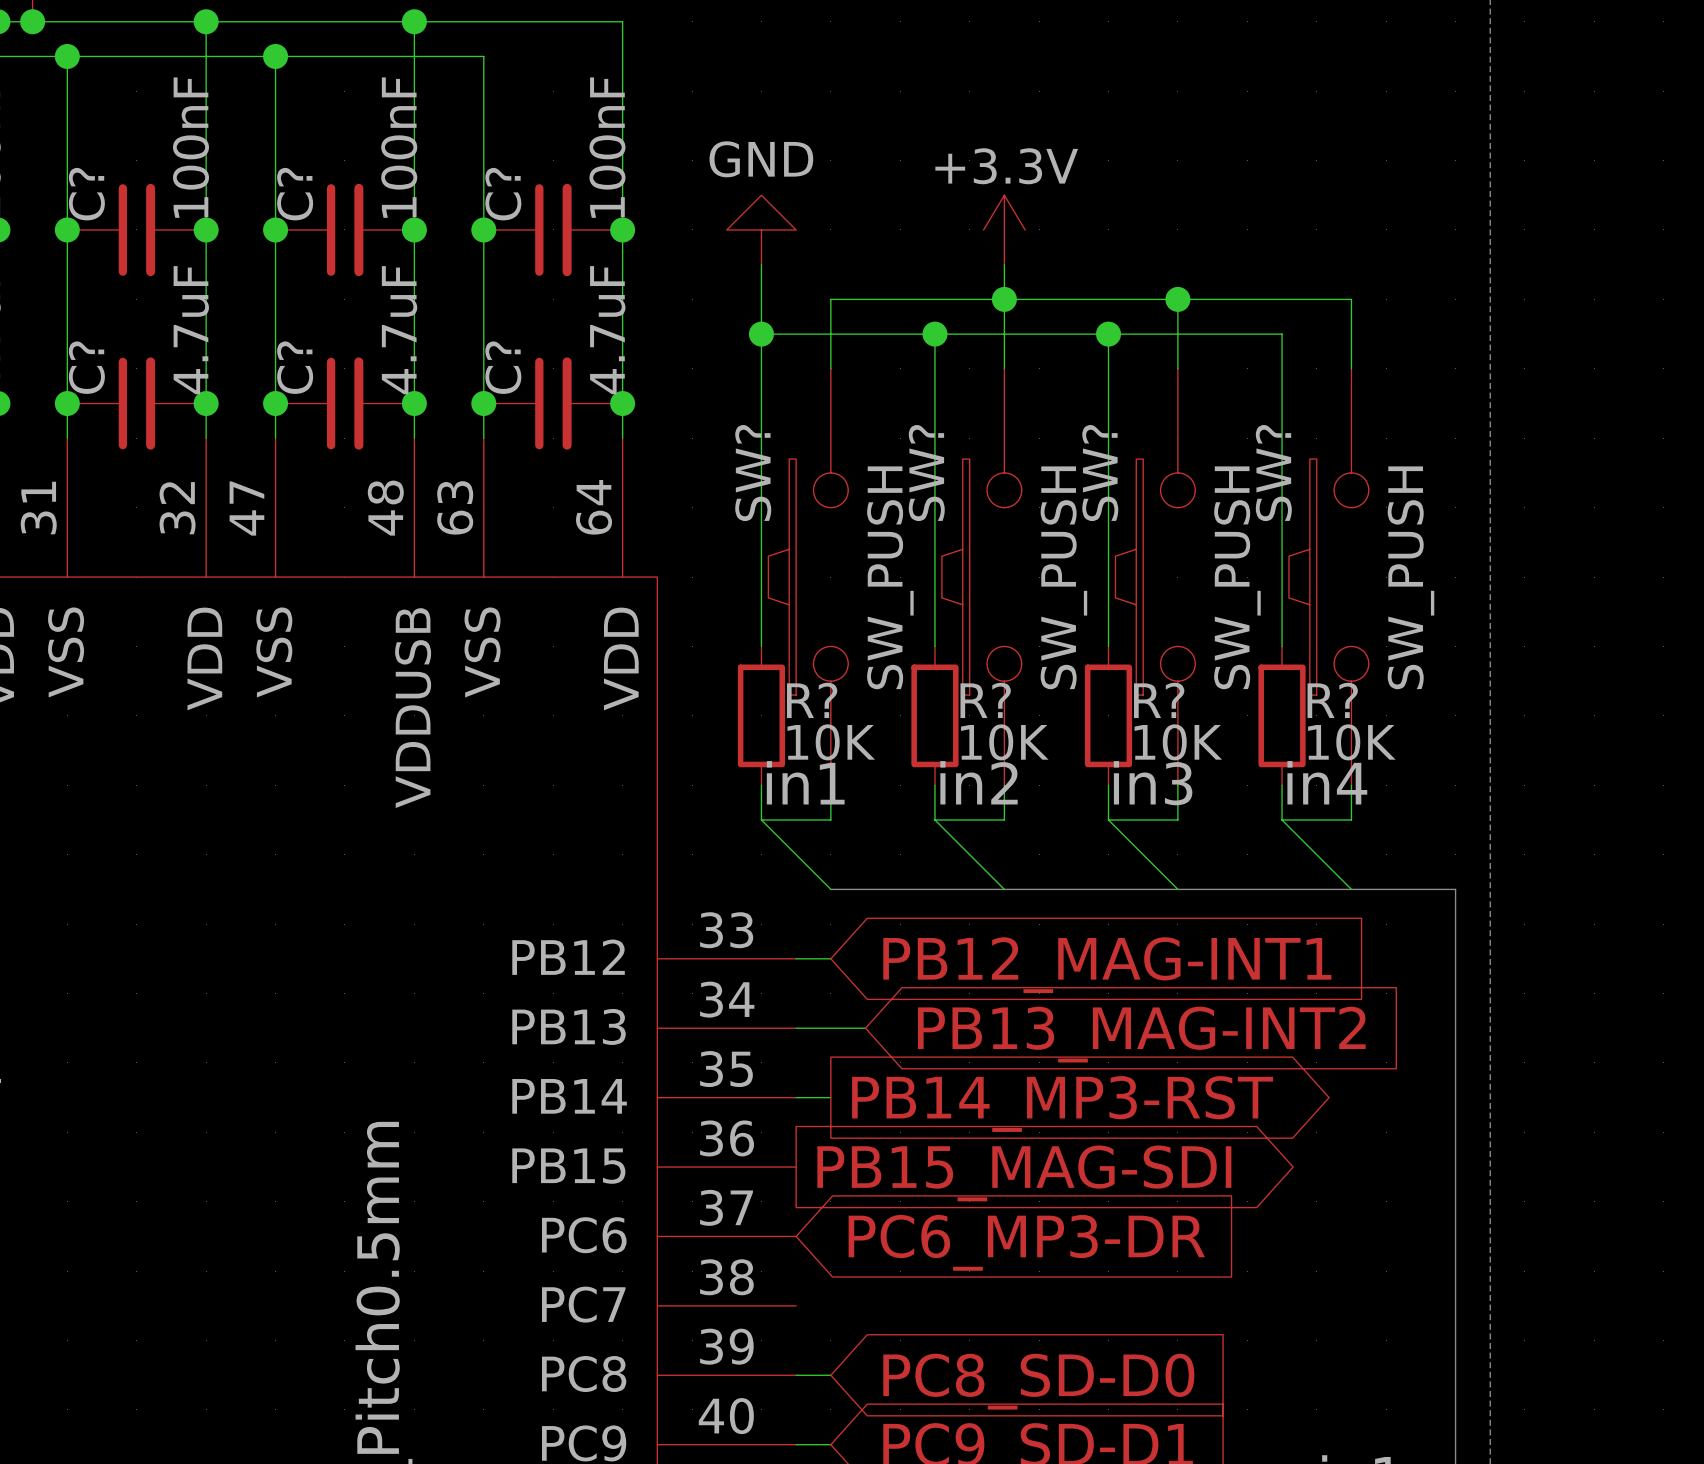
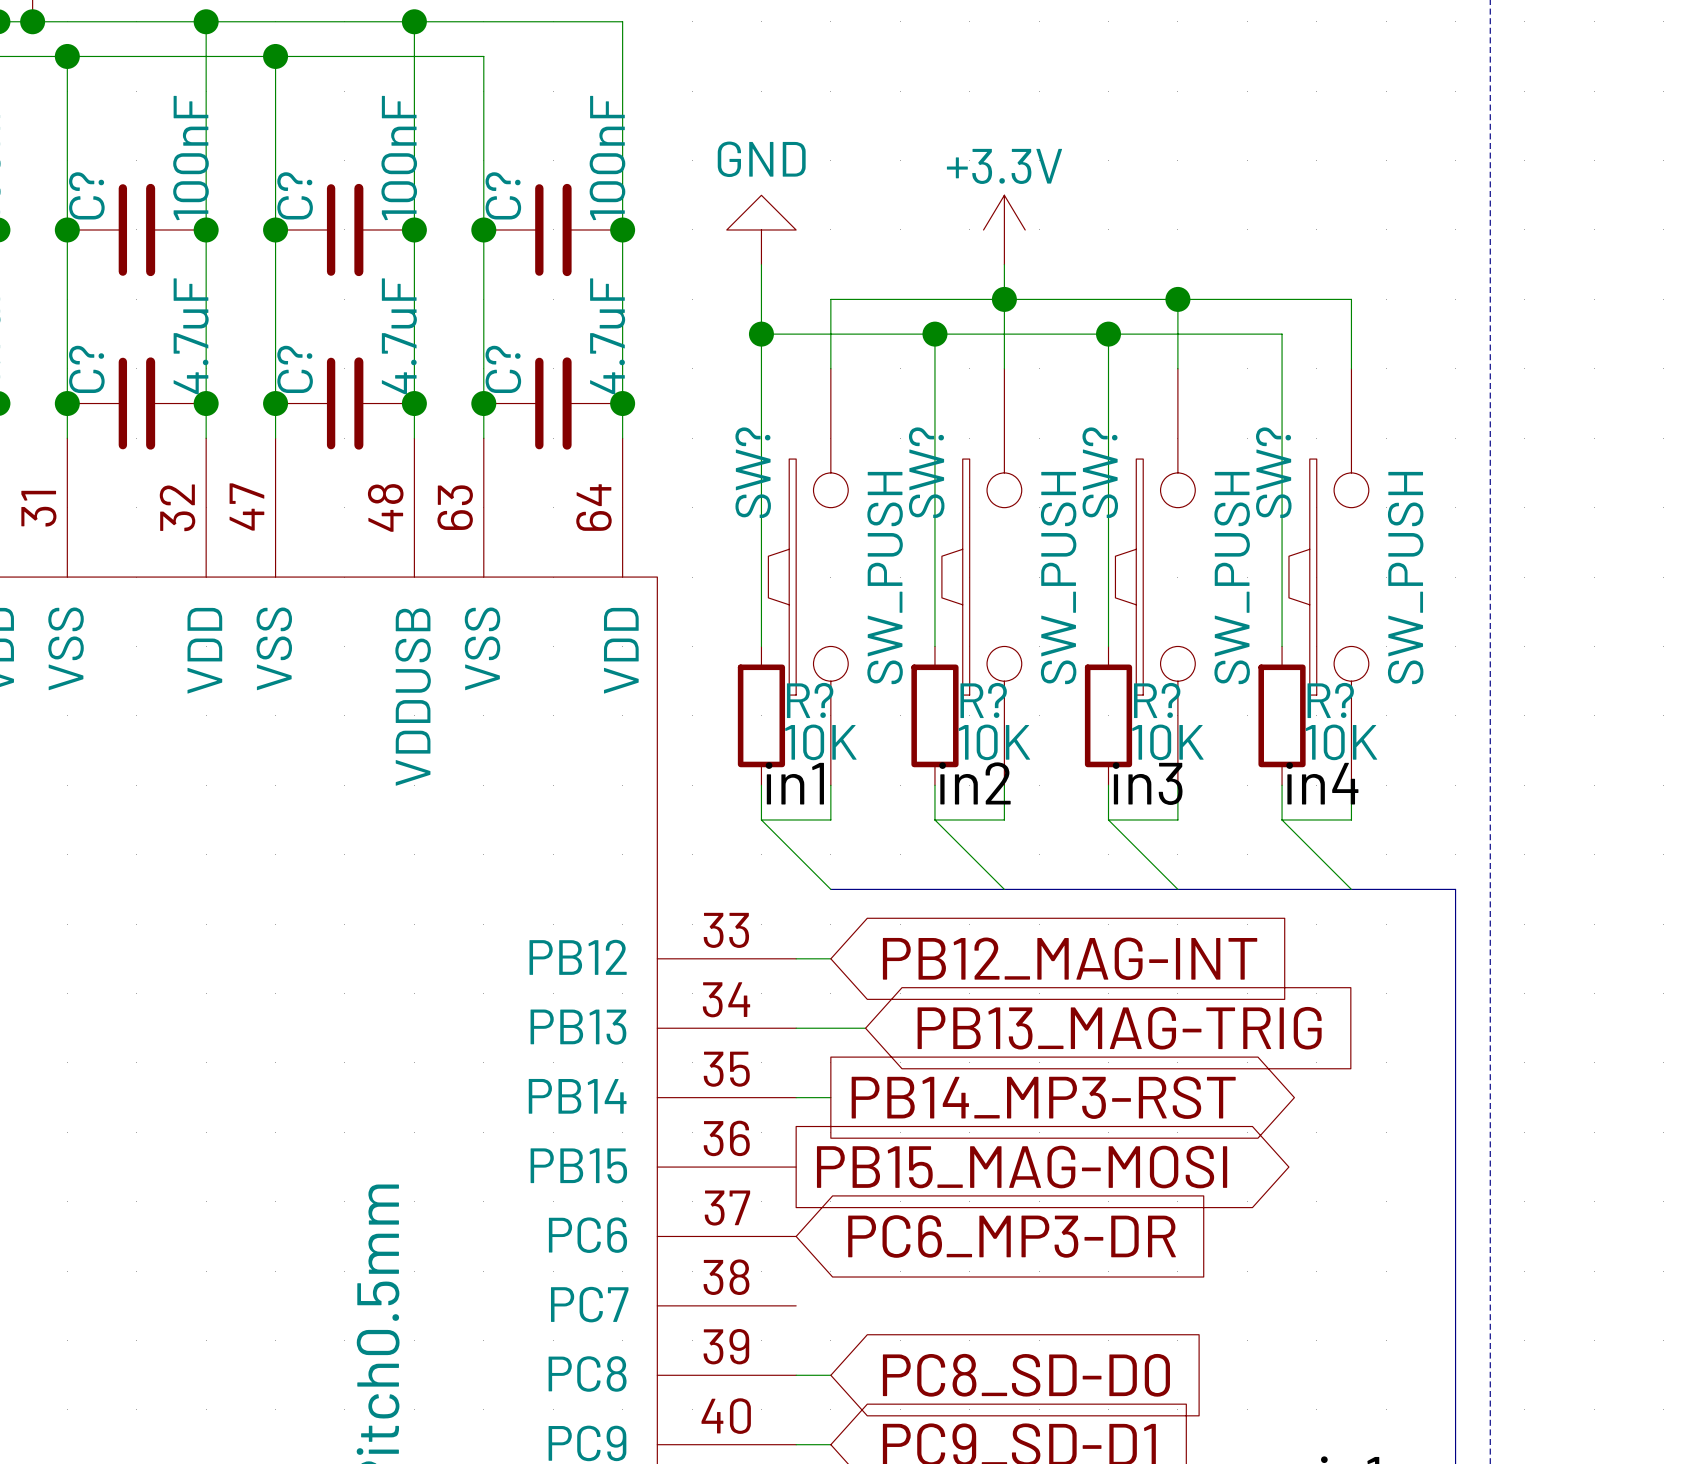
global label: PB12_MAG-INT1 (1107, 965) -> PB12_MAG-INT (1070, 958)
global label: PB13_MAG-INT2 (1141, 1034) -> PB13_MAG-TRIG (1119, 1028)
global label: PB15_MAG-SDI (1024, 1173) -> PB15_MAG-MOSI (1022, 1167)

